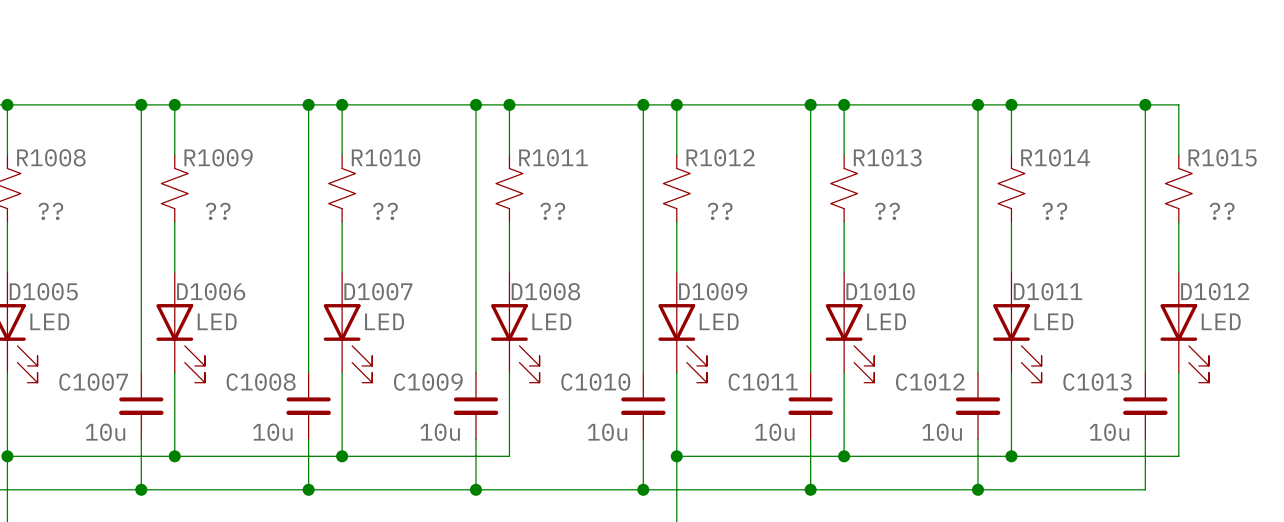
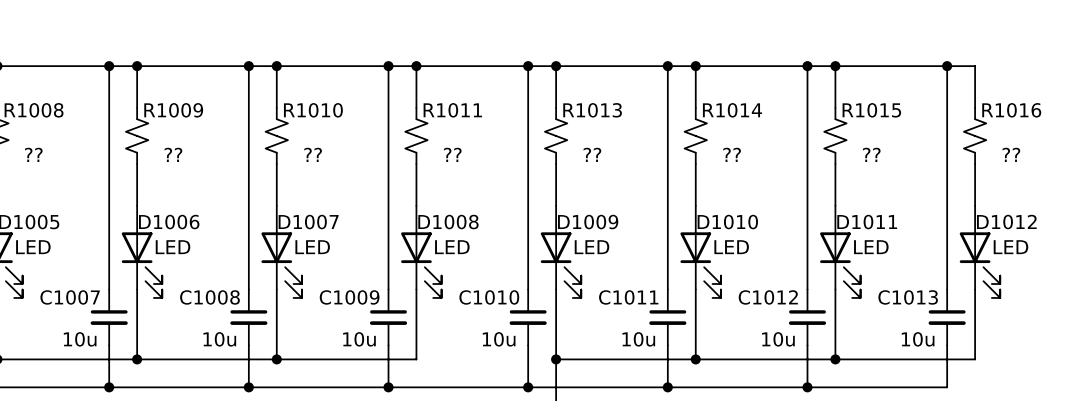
R1012 name: R1012 (720, 157) -> R1013 (592, 110)
R1013 name: R1013 (887, 157) -> R1014 (732, 110)
R1014 name: R1014 (1055, 157) -> R1015 (871, 110)
R1015 name: R1015 (1222, 157) -> R1016 (1011, 110)

